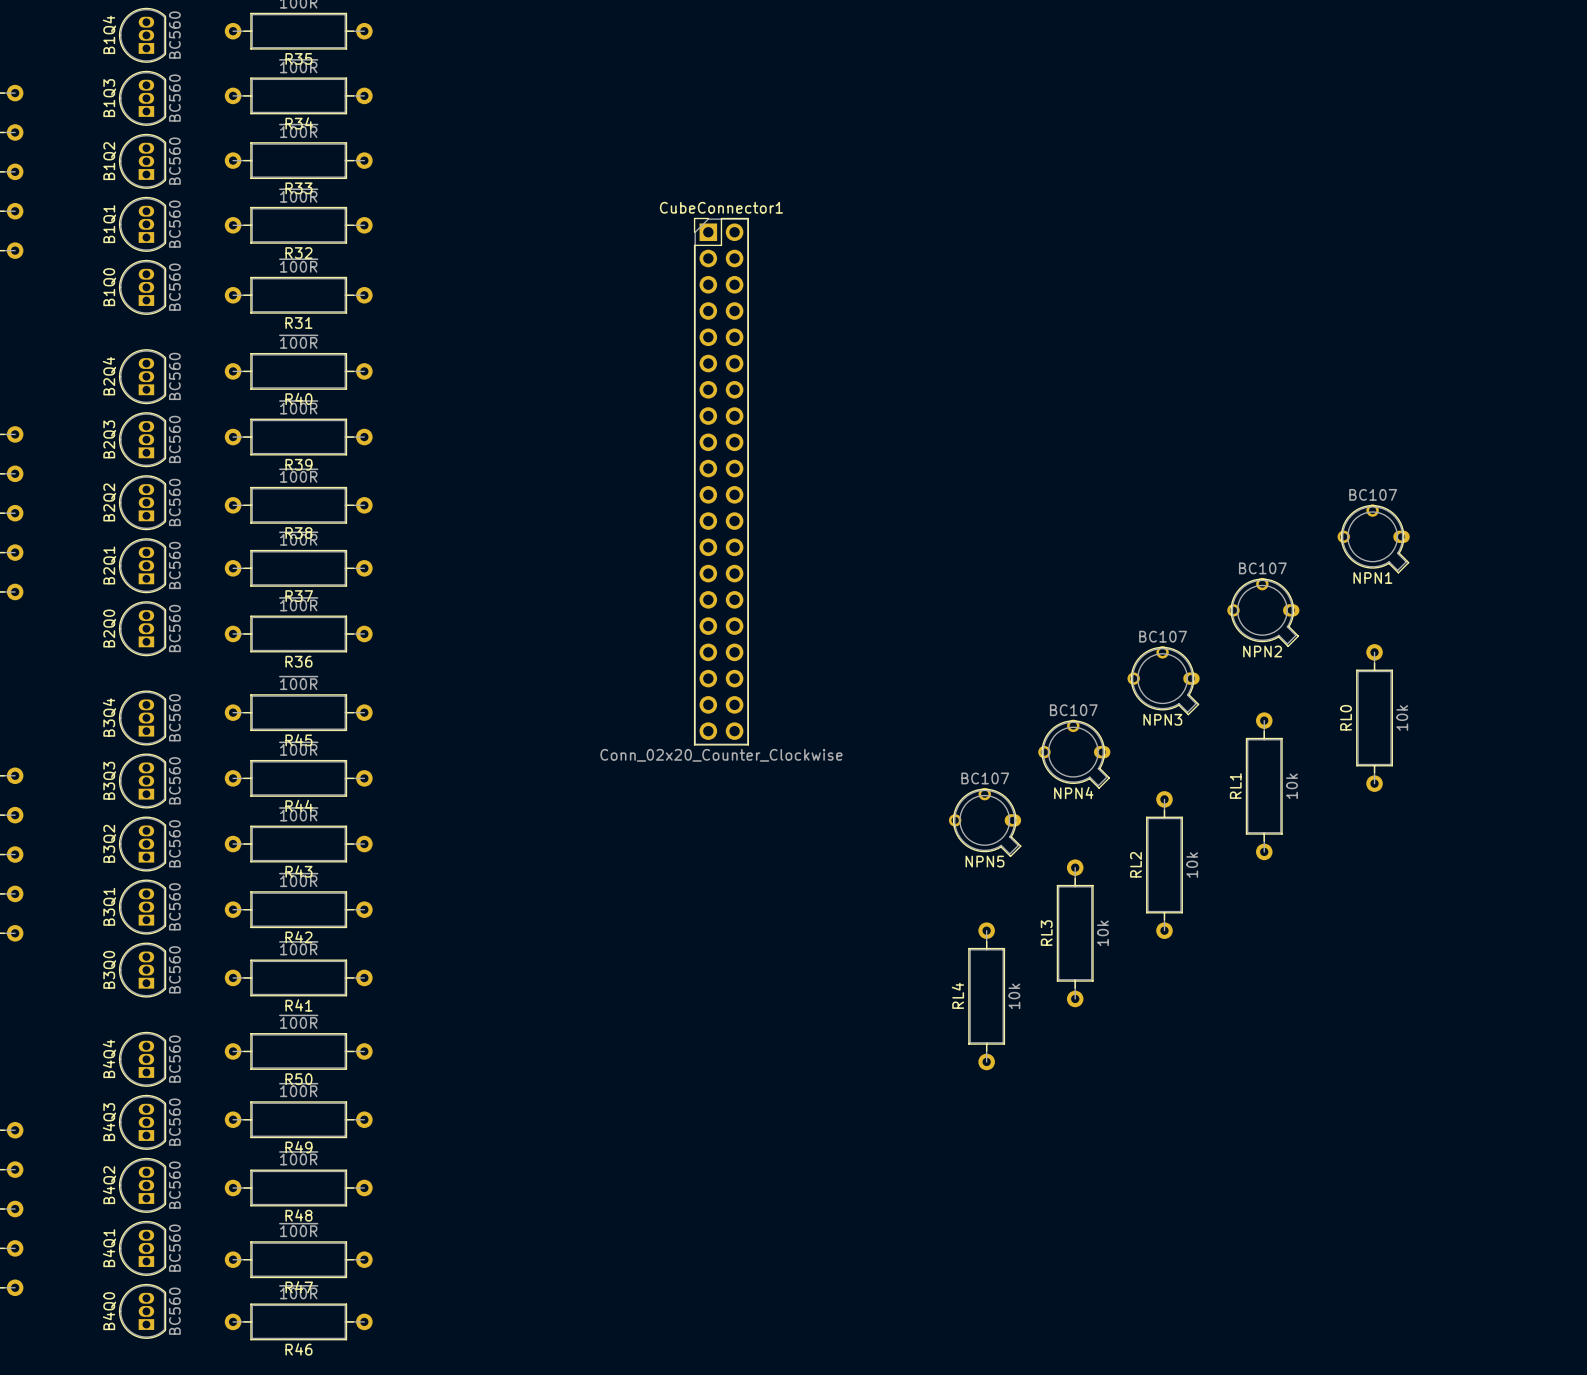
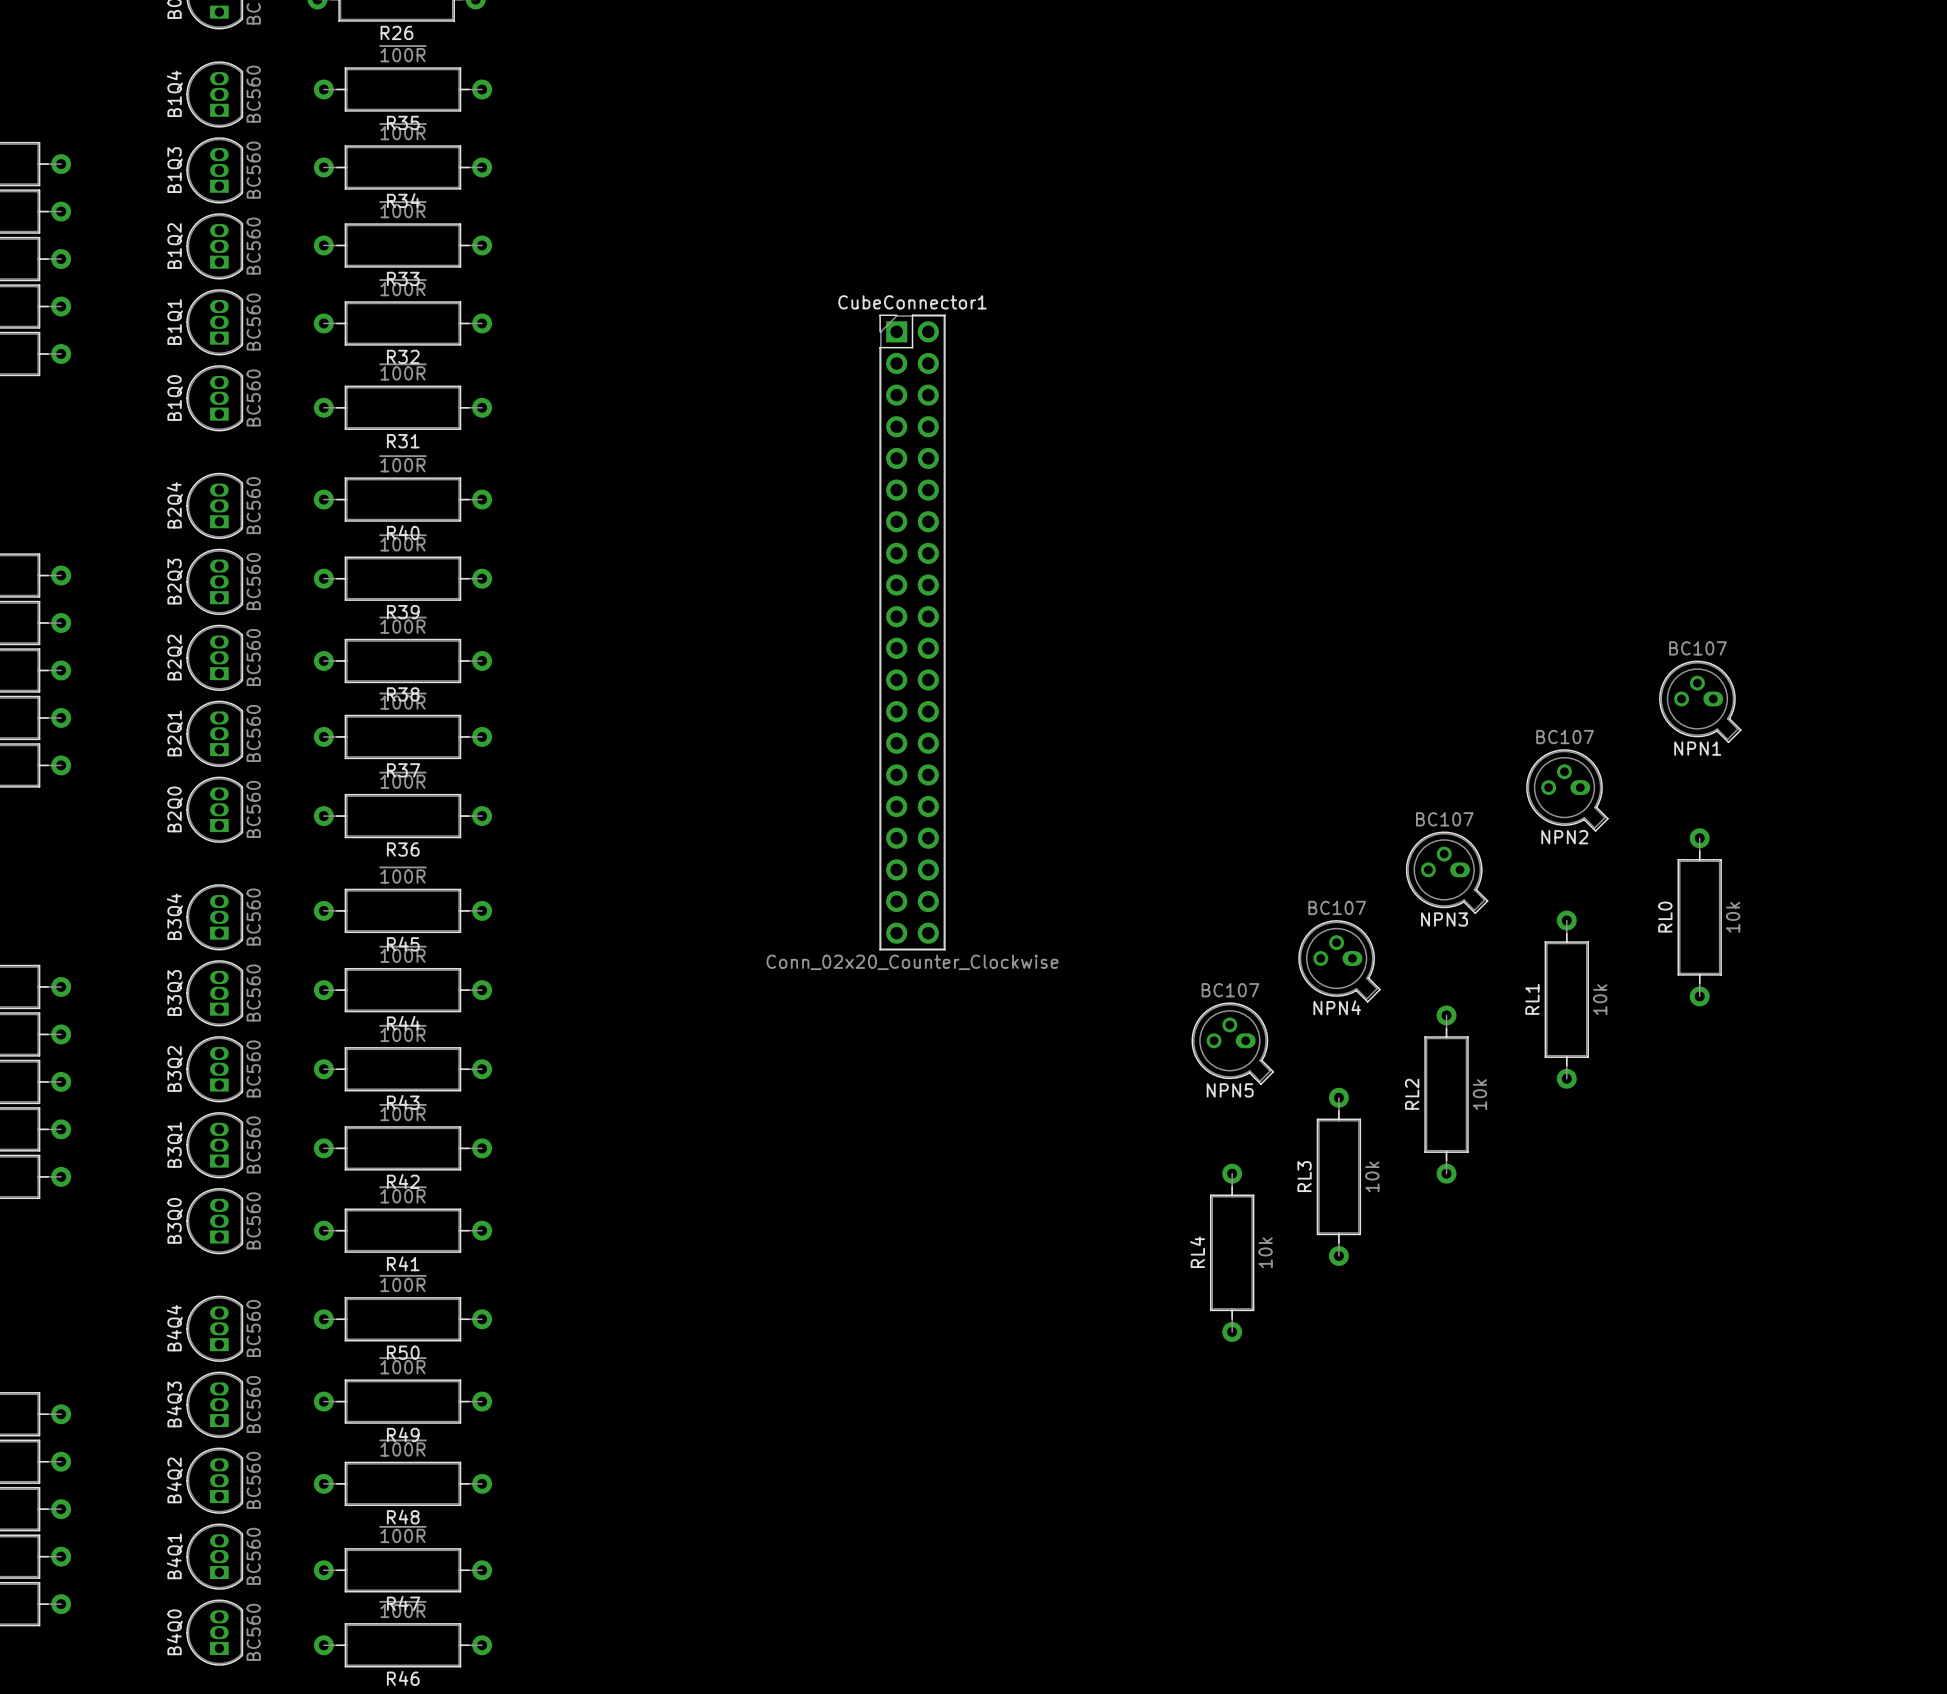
NPN1 footprint: [1337, 504, 1410, 574] -> [1659, 660, 1742, 744]
NPN2 footprint: [1227, 577, 1300, 647] -> [1526, 749, 1609, 832]
NPN3 footprint: [1127, 646, 1200, 716] -> [1405, 831, 1489, 915]
NPN4 footprint: [1038, 719, 1111, 789] -> [1298, 920, 1381, 1003]
NPN5 footprint: [948, 787, 1022, 858] -> [1191, 1002, 1275, 1085]

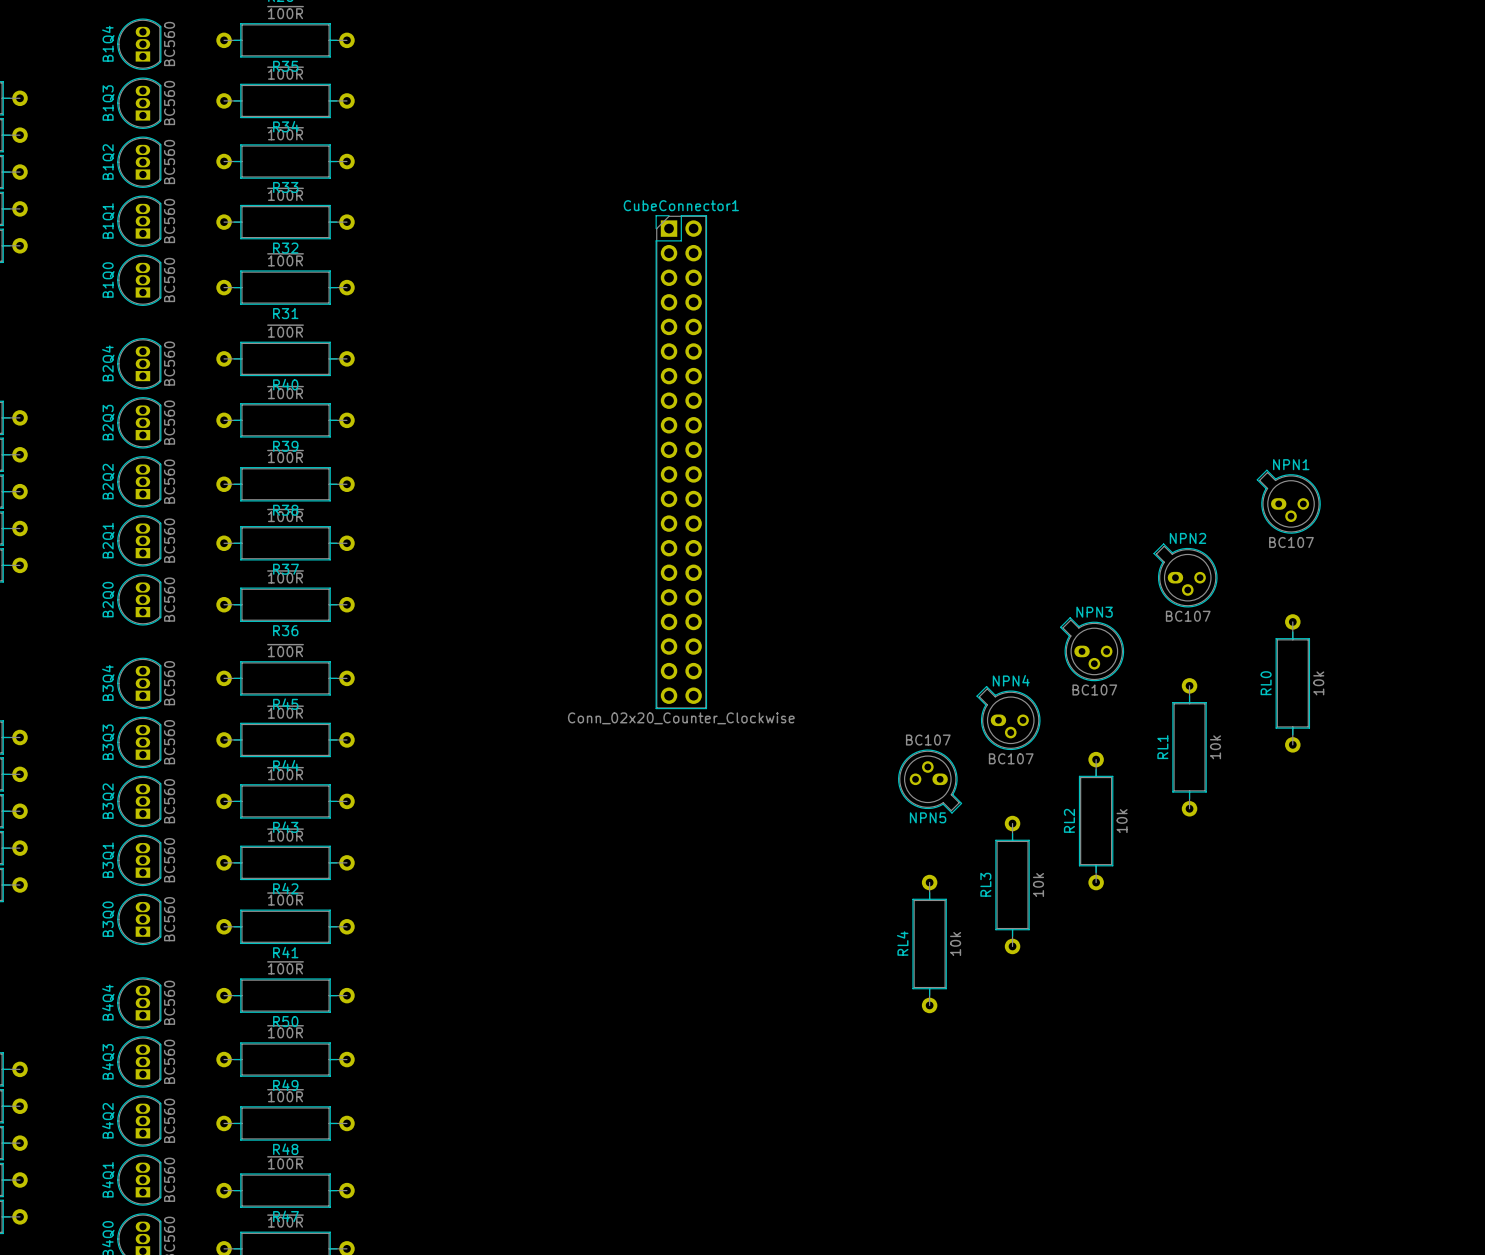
NPN1 rotation: 0° (1700, 701) -> 180° (1288, 501)
NPN2 rotation: 0° (1567, 790) -> 180° (1185, 575)
NPN3 rotation: 0° (1447, 872) -> 180° (1092, 649)
NPN4 rotation: 0° (1339, 961) -> 180° (1008, 718)

